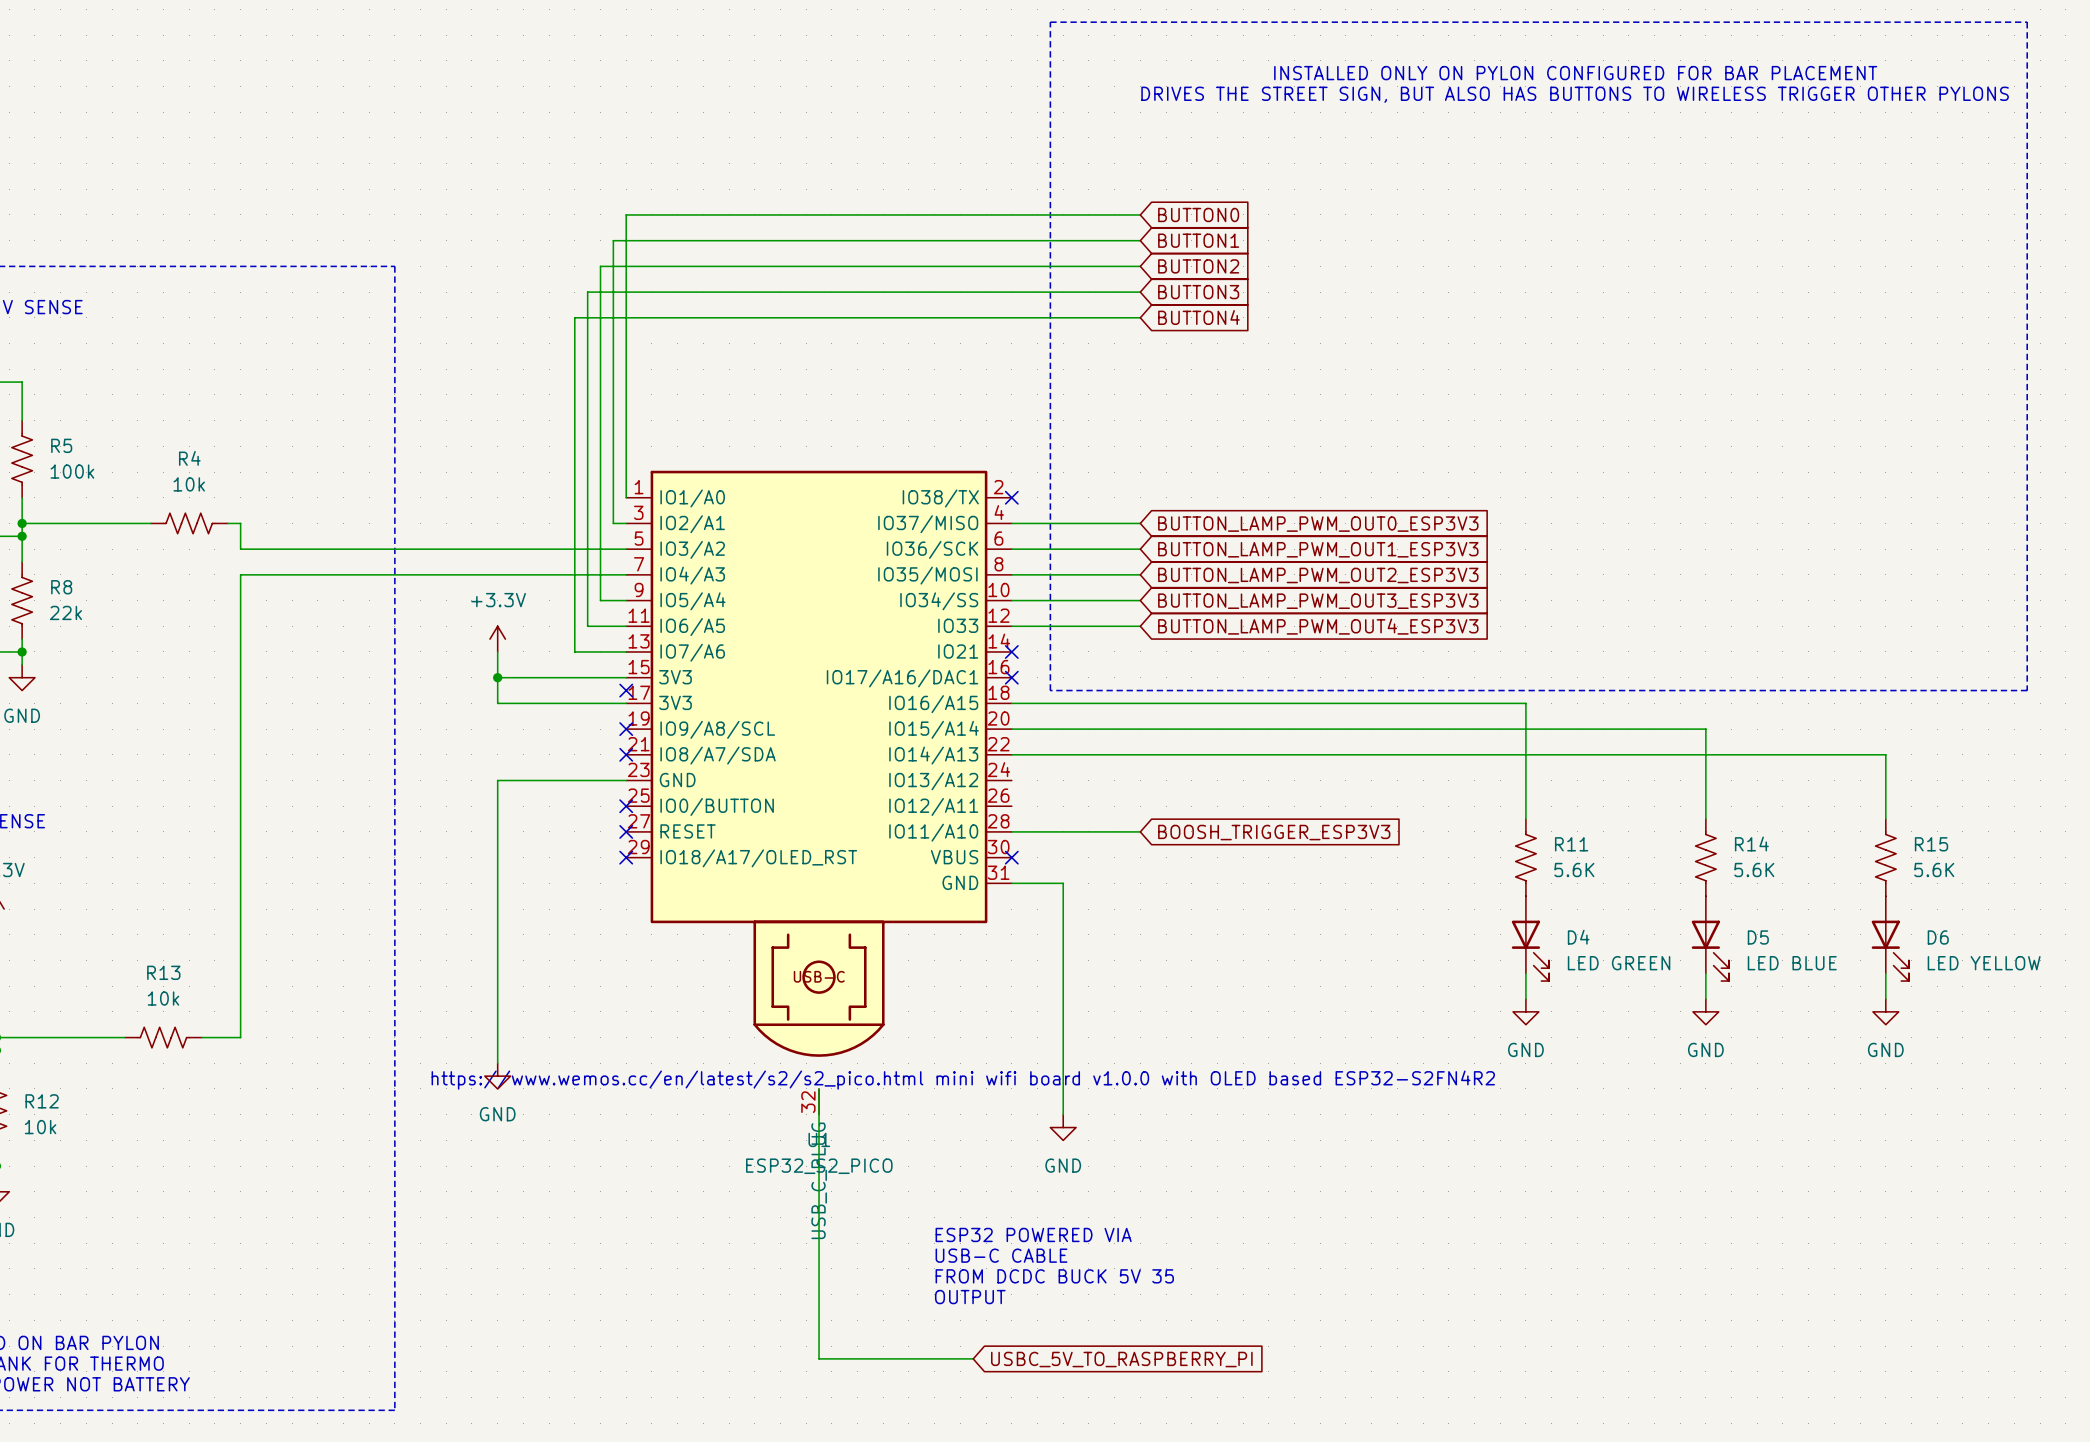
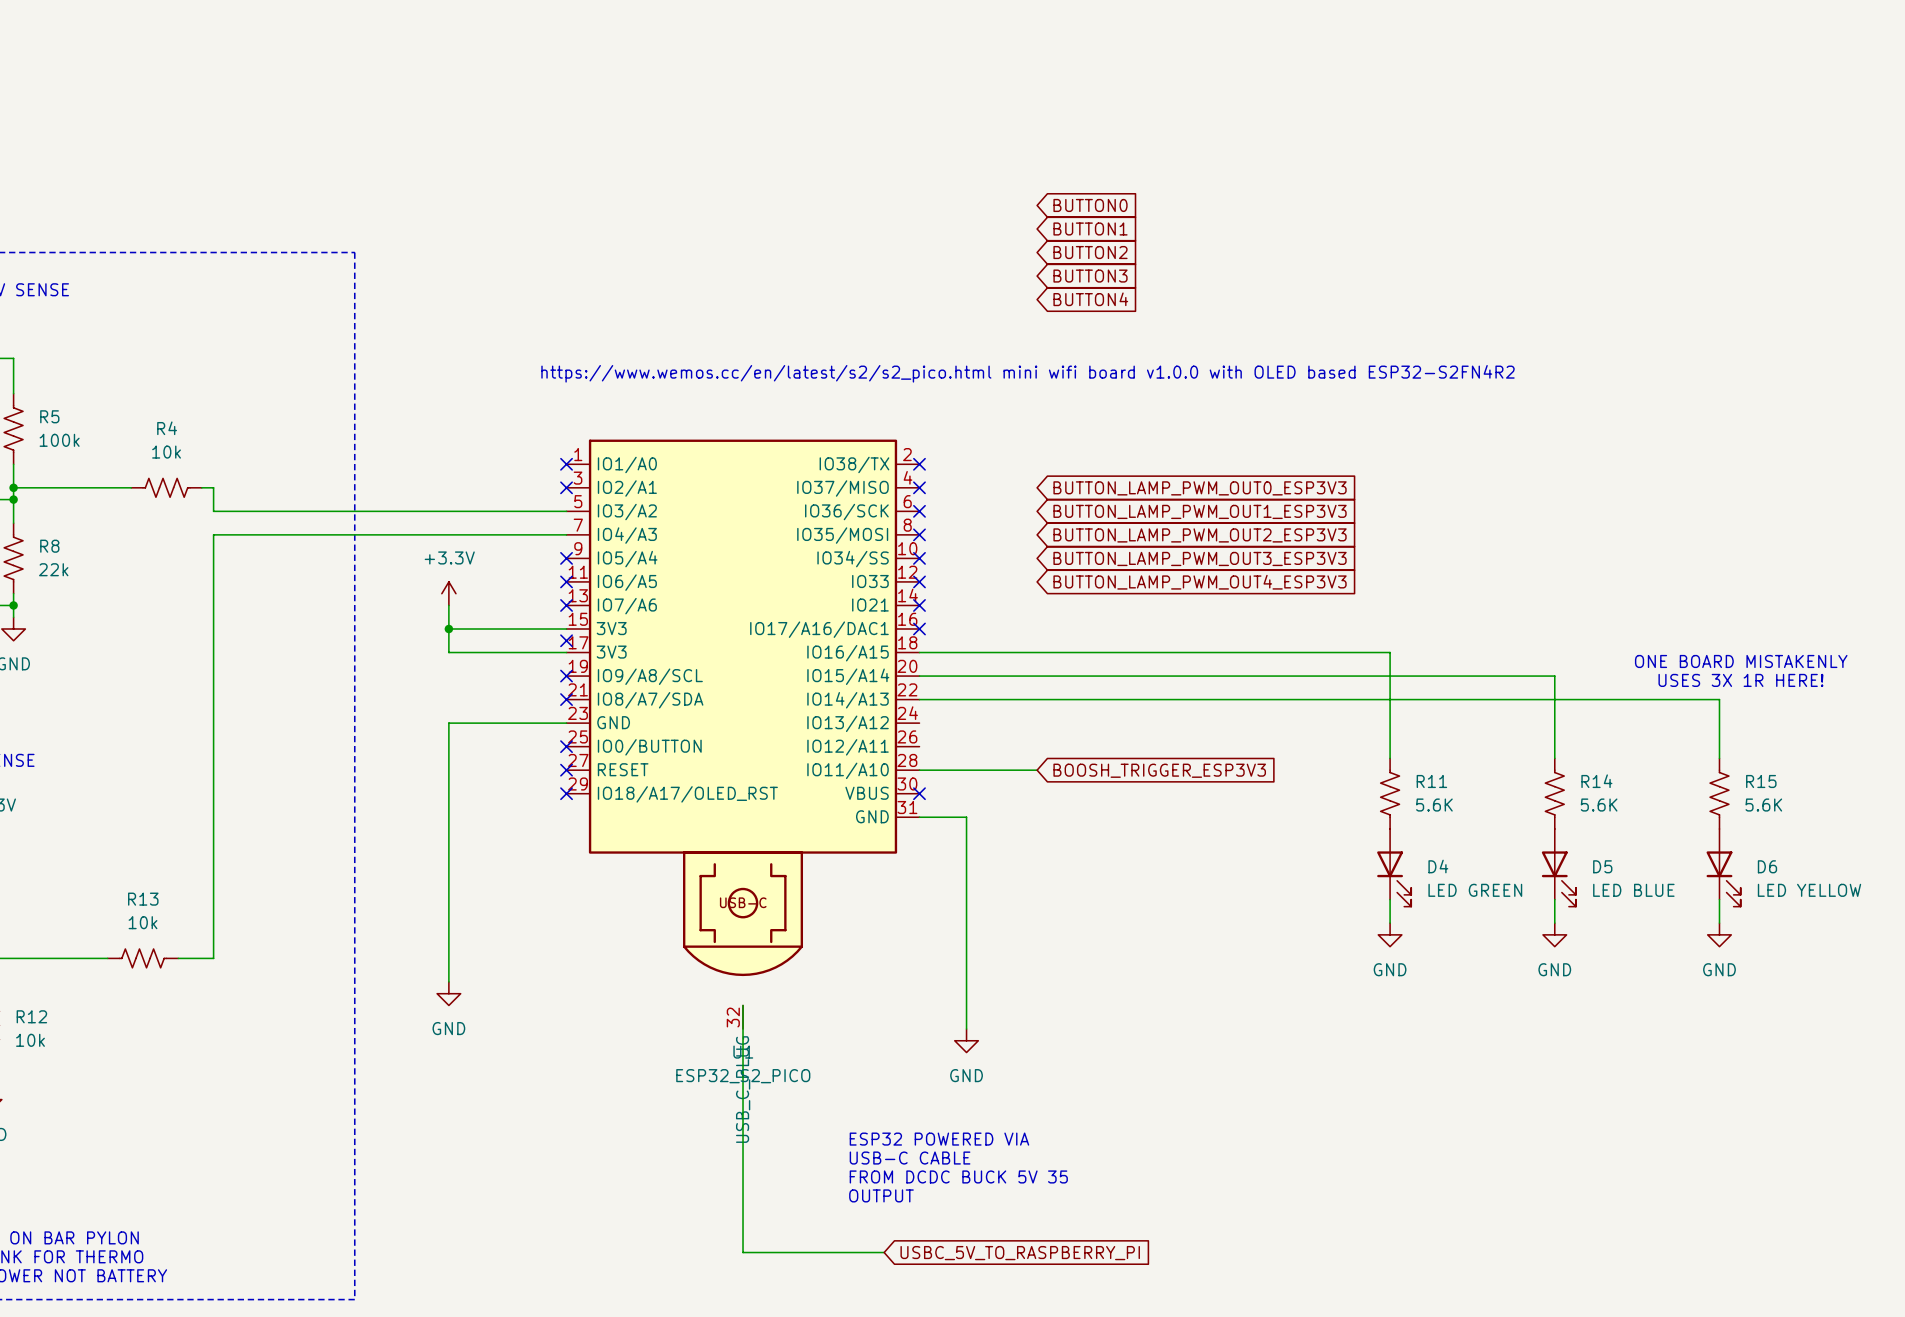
line: (1050, 22) (2027, 22) (2027, 690) (1050, 690) (1050, 22) -> none
text: INSTALLED ONLY ON PYLON CONFIGURED FOR BAR PLACEMENT (1575, 73) -> none
text: DRIVES THE STREET SIGN, BUT ALSO HAS BUTTONS TO WIRELESS TRIGGER OTHER PYLONS (1575, 94) -> none
wire: (1140, 214) (626, 214) (626, 497) -> none
wire: (1140, 240) (613, 240) (613, 523) (626, 523) -> none
wire: (1140, 266) (600, 266) (600, 600) (626, 600) -> none
wire: (1140, 292) (587, 292) (587, 626) (626, 626) -> none
wire: (1140, 317) (574, 317) (574, 651) (626, 651) -> none
text: none -> https://www.wemos.cc/en/latest/s2/s2_pico.html mini wifi board v1.0.0 with OLED based ESP32-S2FN4R2 (1027, 373)
no-connect mark: none -> (566, 464)
no-connect mark: none -> (566, 487)
wire: (1011, 523) (1140, 523) -> none
no-connect mark: none -> (919, 487)
wire: (1011, 549) (1140, 549) -> none
no-connect mark: none -> (919, 511)
wire: (1011, 574) (1140, 574) -> none
no-connect mark: none -> (919, 534)
no-connect mark: none -> (566, 558)
wire: (1011, 600) (1140, 600) -> none
no-connect mark: none -> (919, 558)
no-connect mark: none -> (566, 581)
wire: (1011, 626) (1140, 626) -> none
no-connect mark: none -> (919, 581)
no-connect mark: none -> (566, 605)
text: none -> ONE BOARD MISTAKENLY (1741, 661)
text: none -> USES 3X 1R HERE! (1740, 680)
text: https://www.wemos.cc/en/latest/s2/s2_pico.html mini wifi board v1.0.0 with OLED based ESP32-S2FN4R2 (963, 1080) -> none

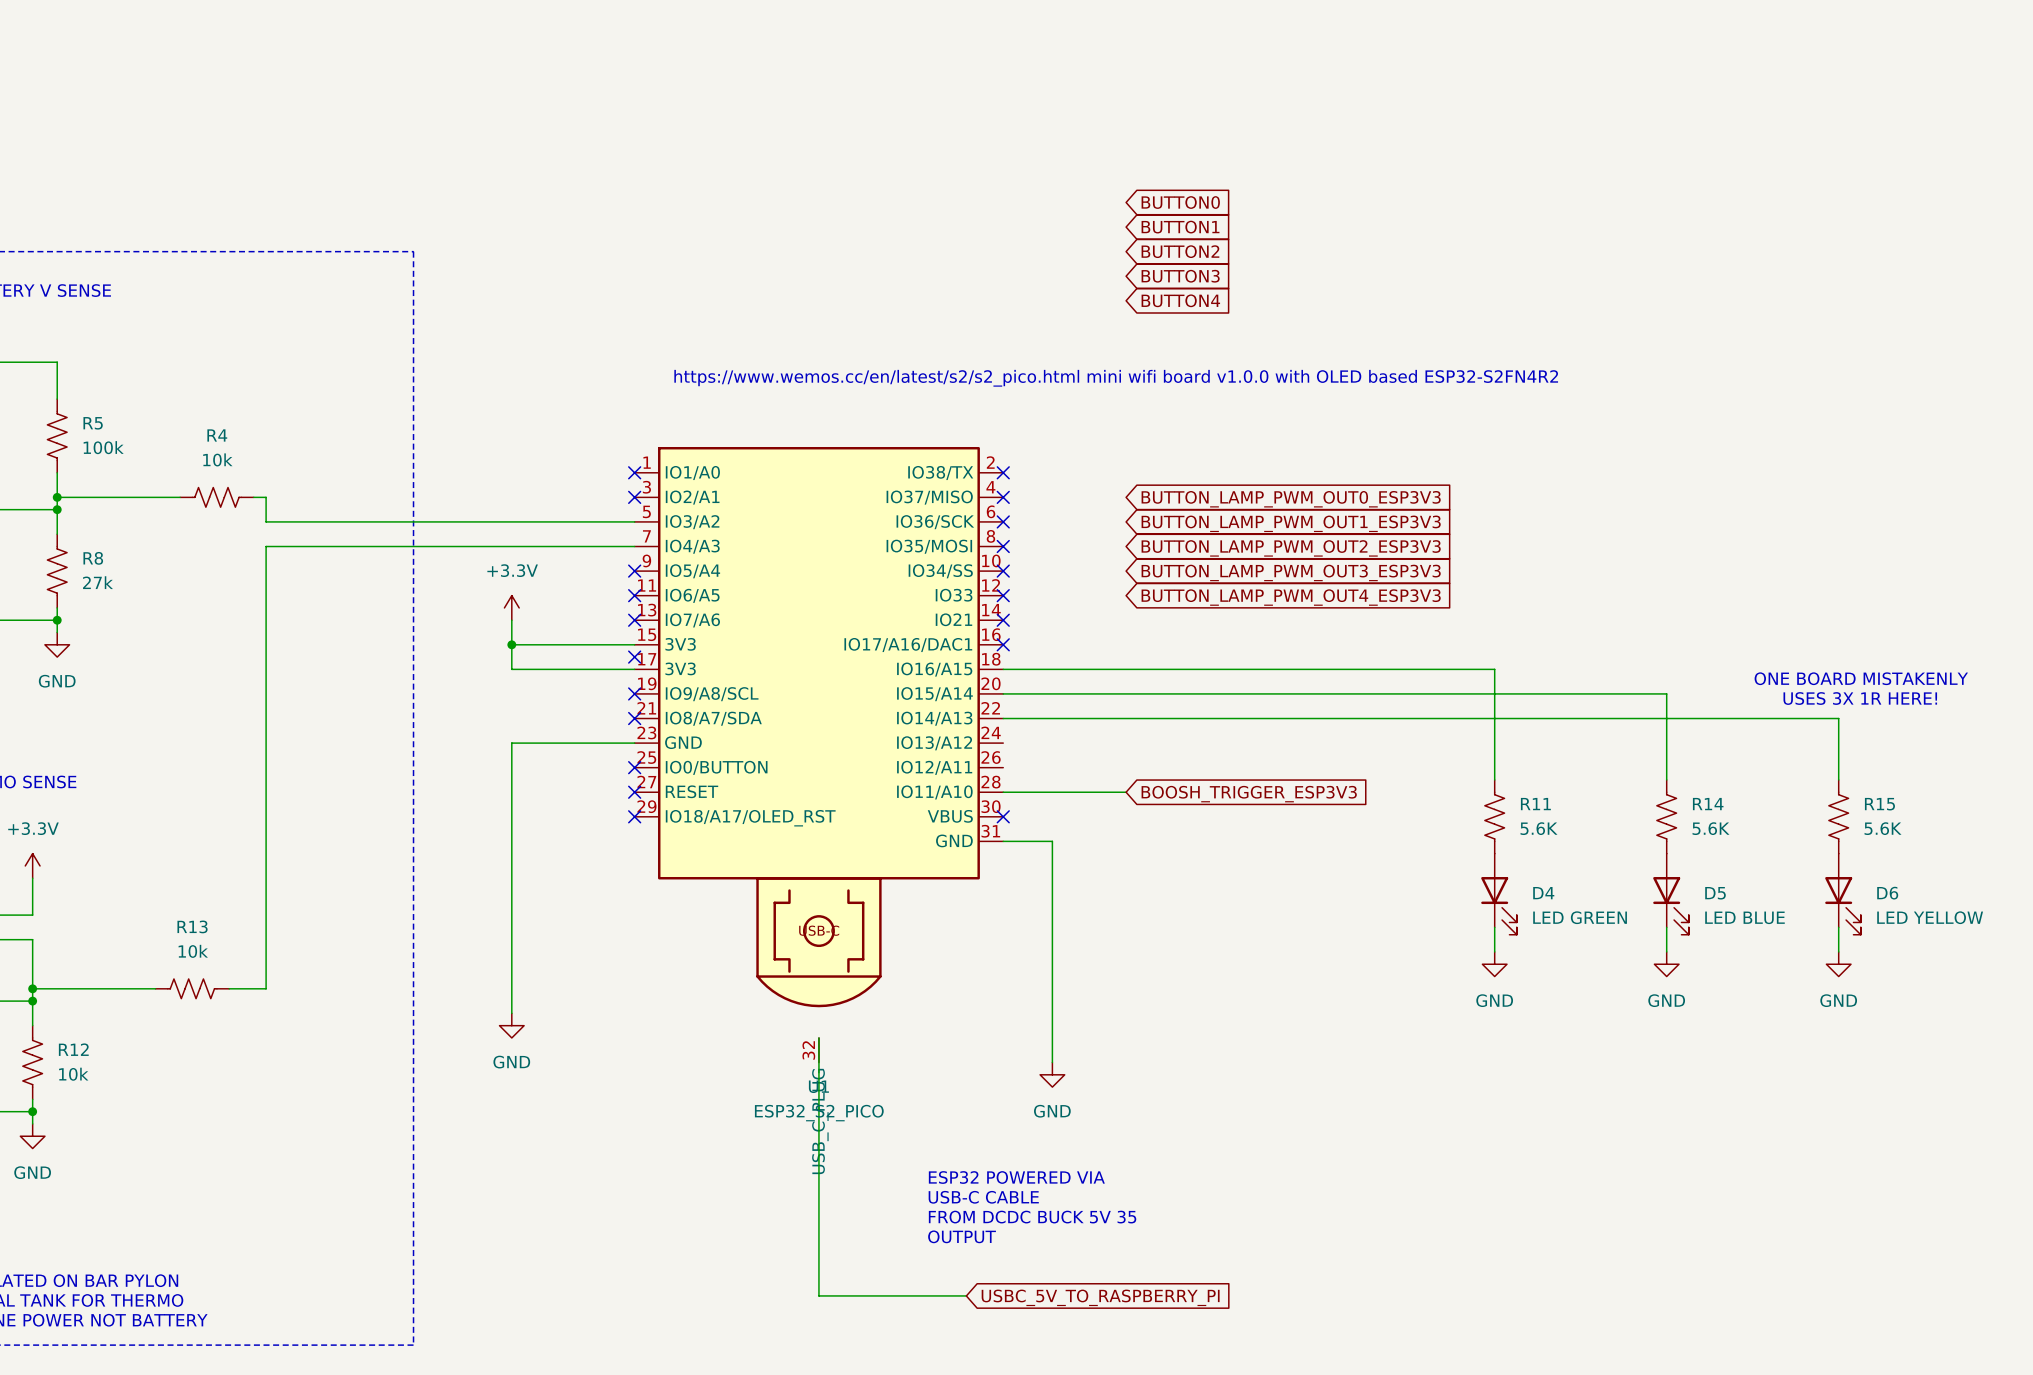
R8 value: 22k (53, 569) -> 27k (97, 582)

